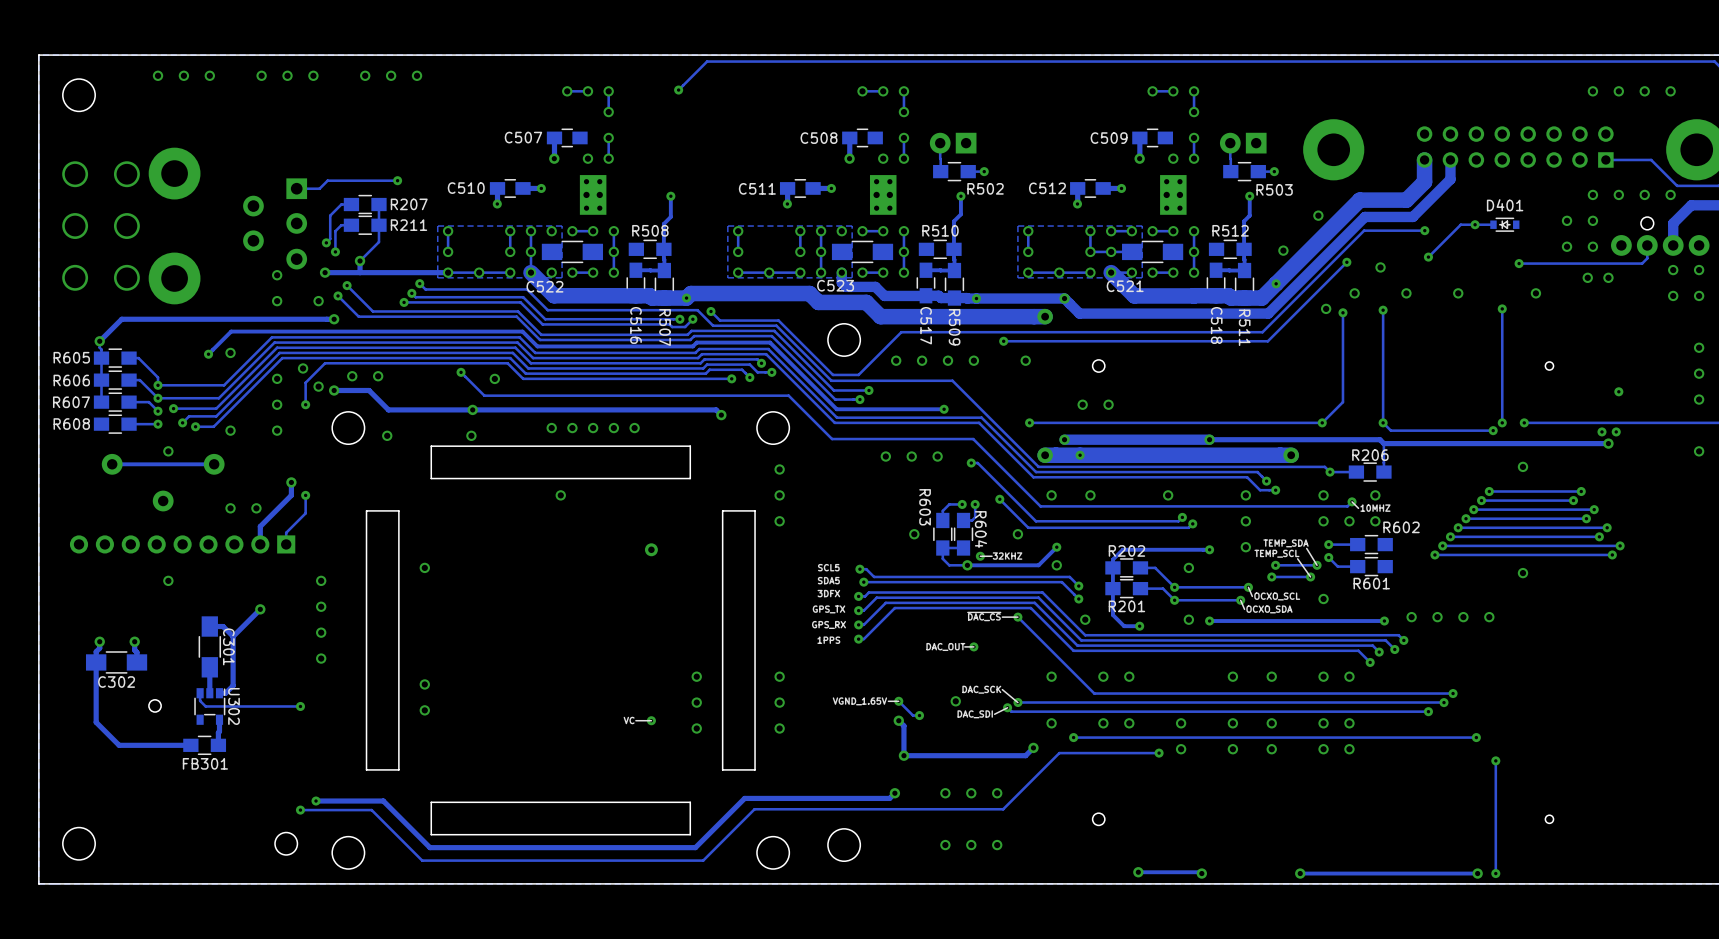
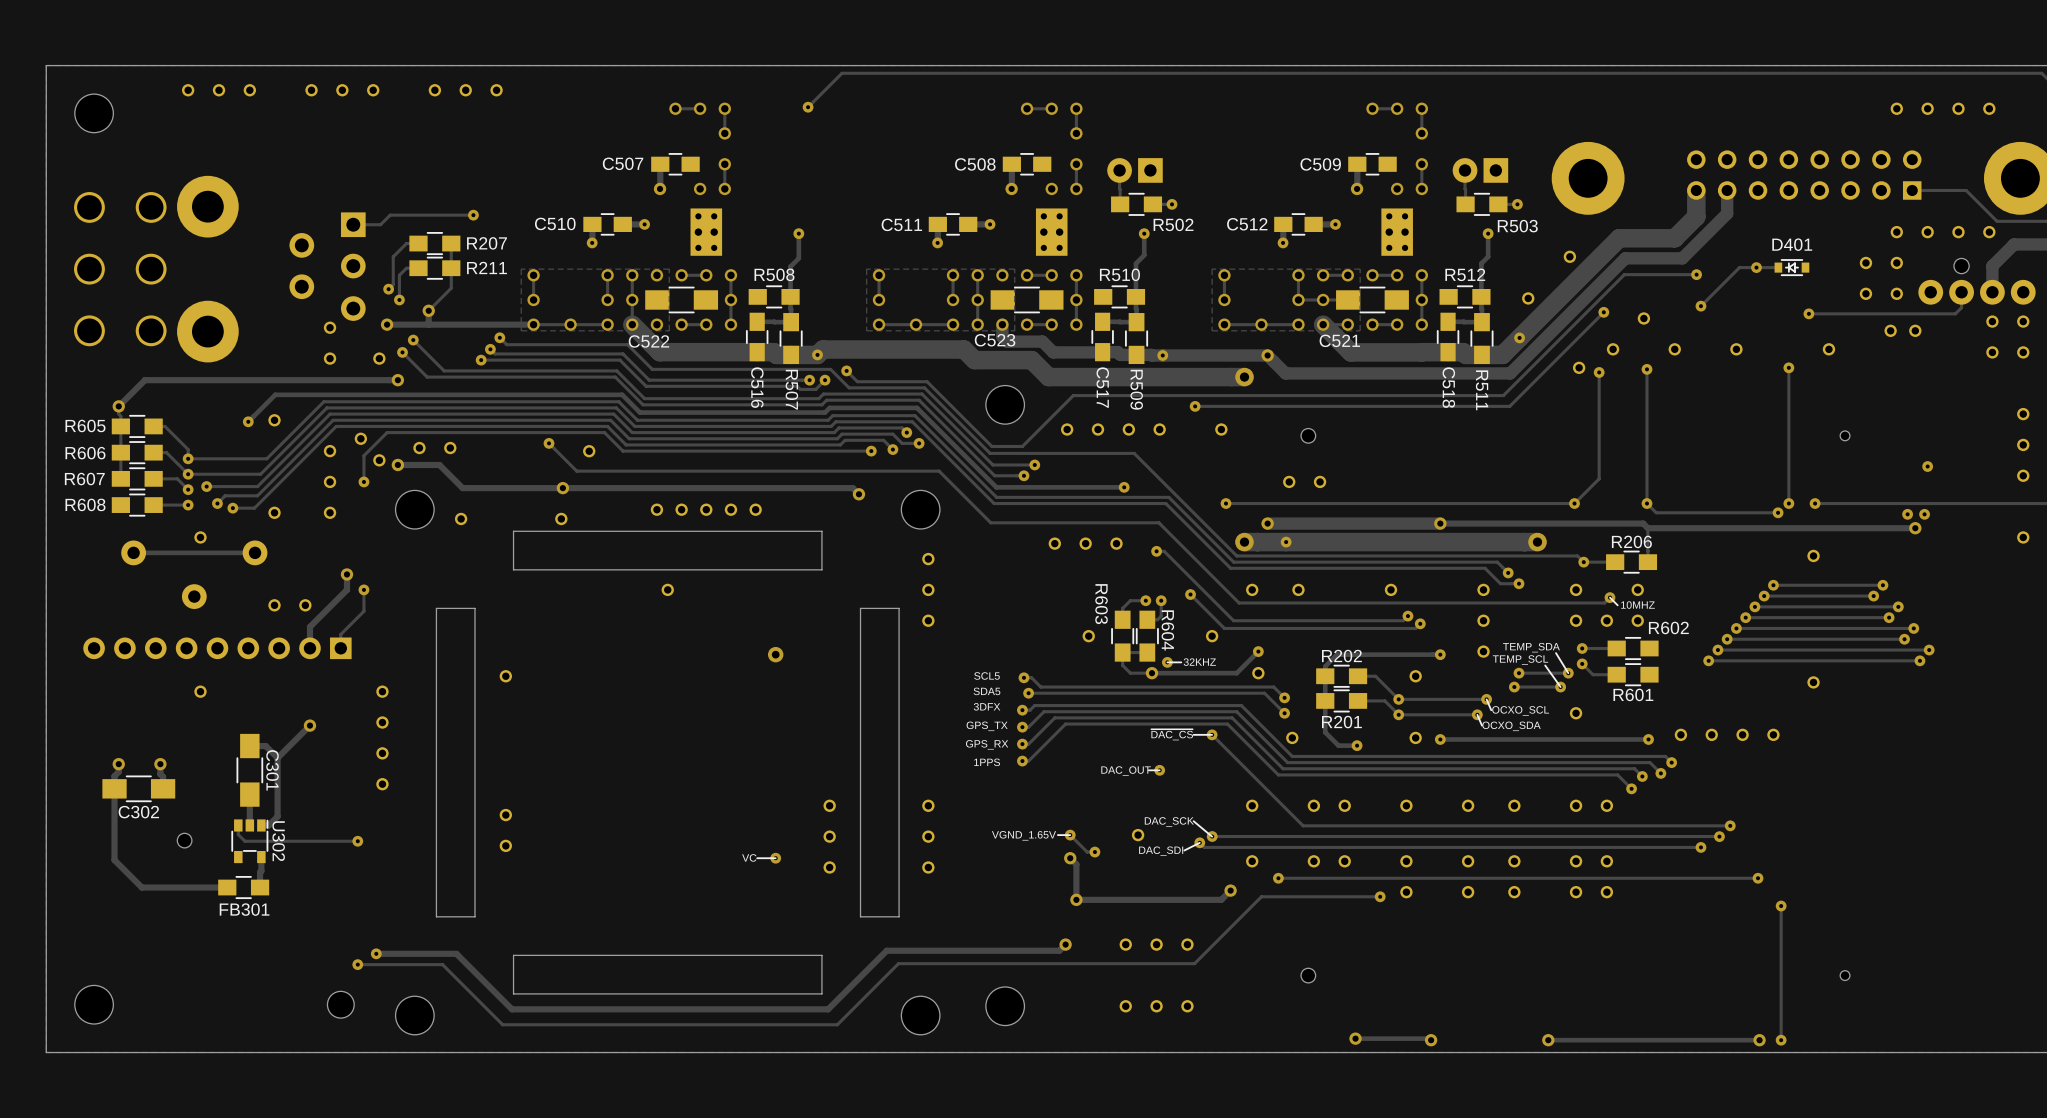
part: none -> (1406, 805)

